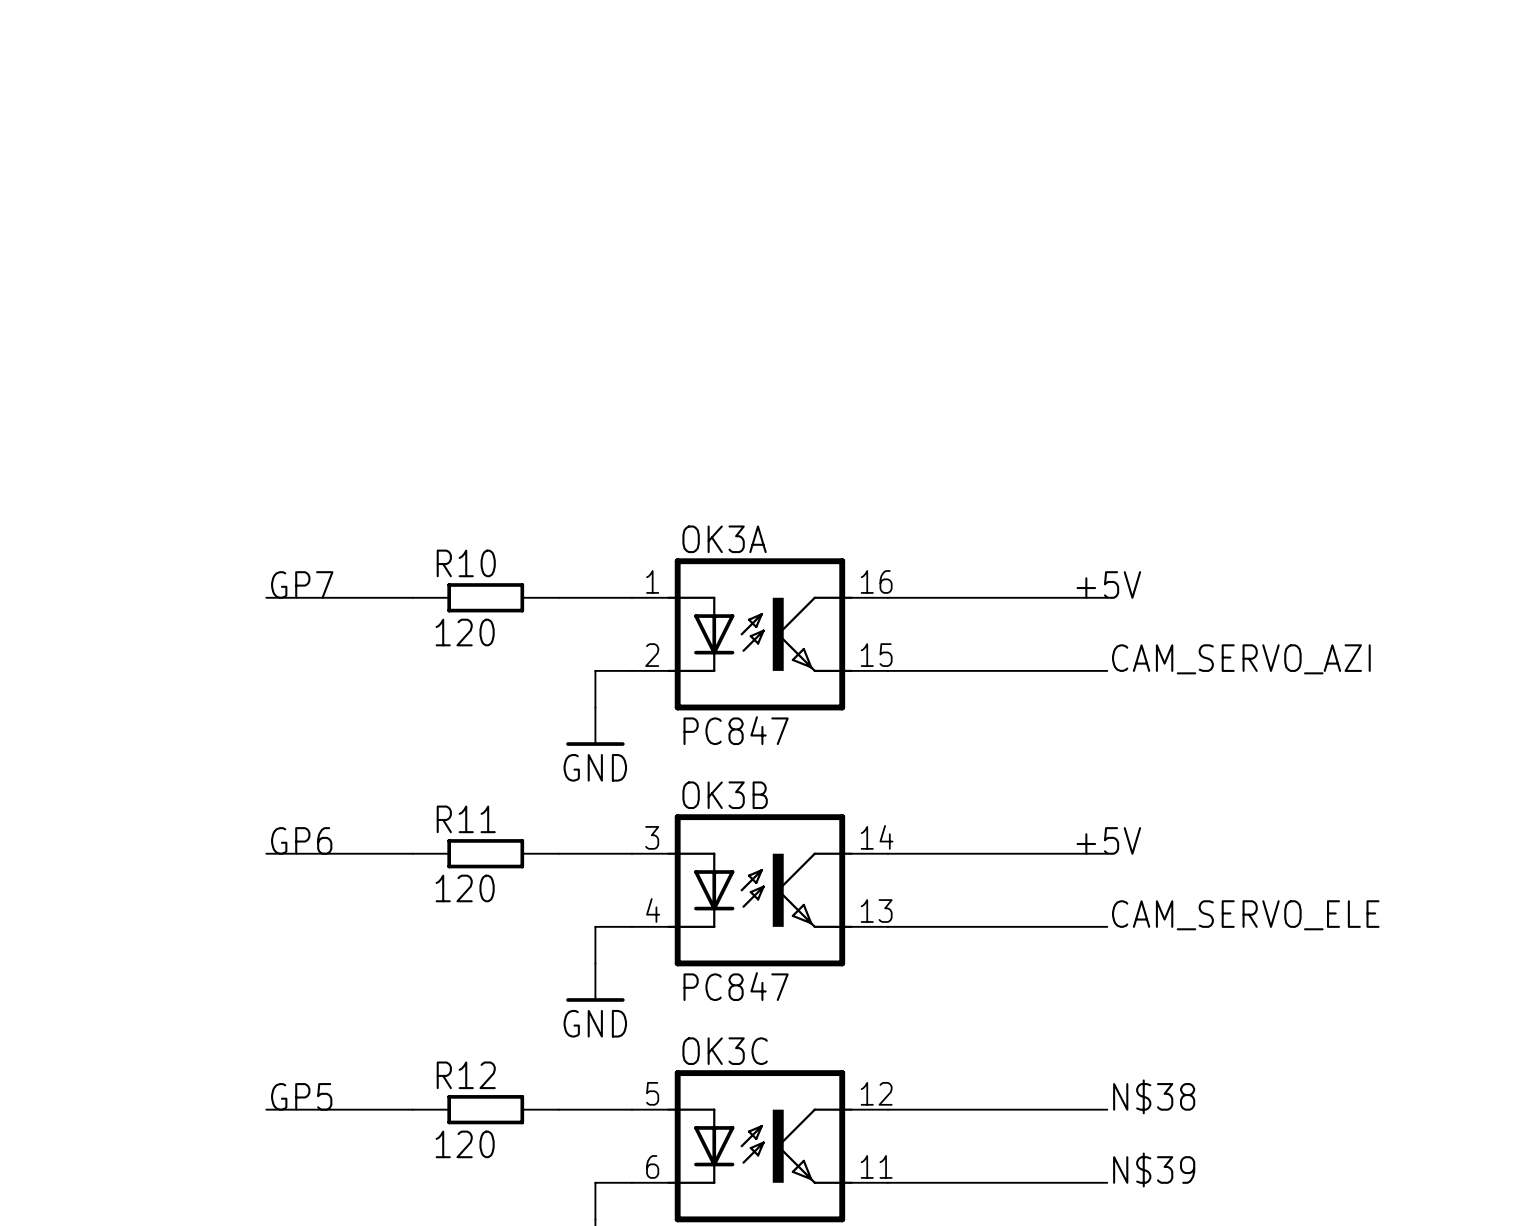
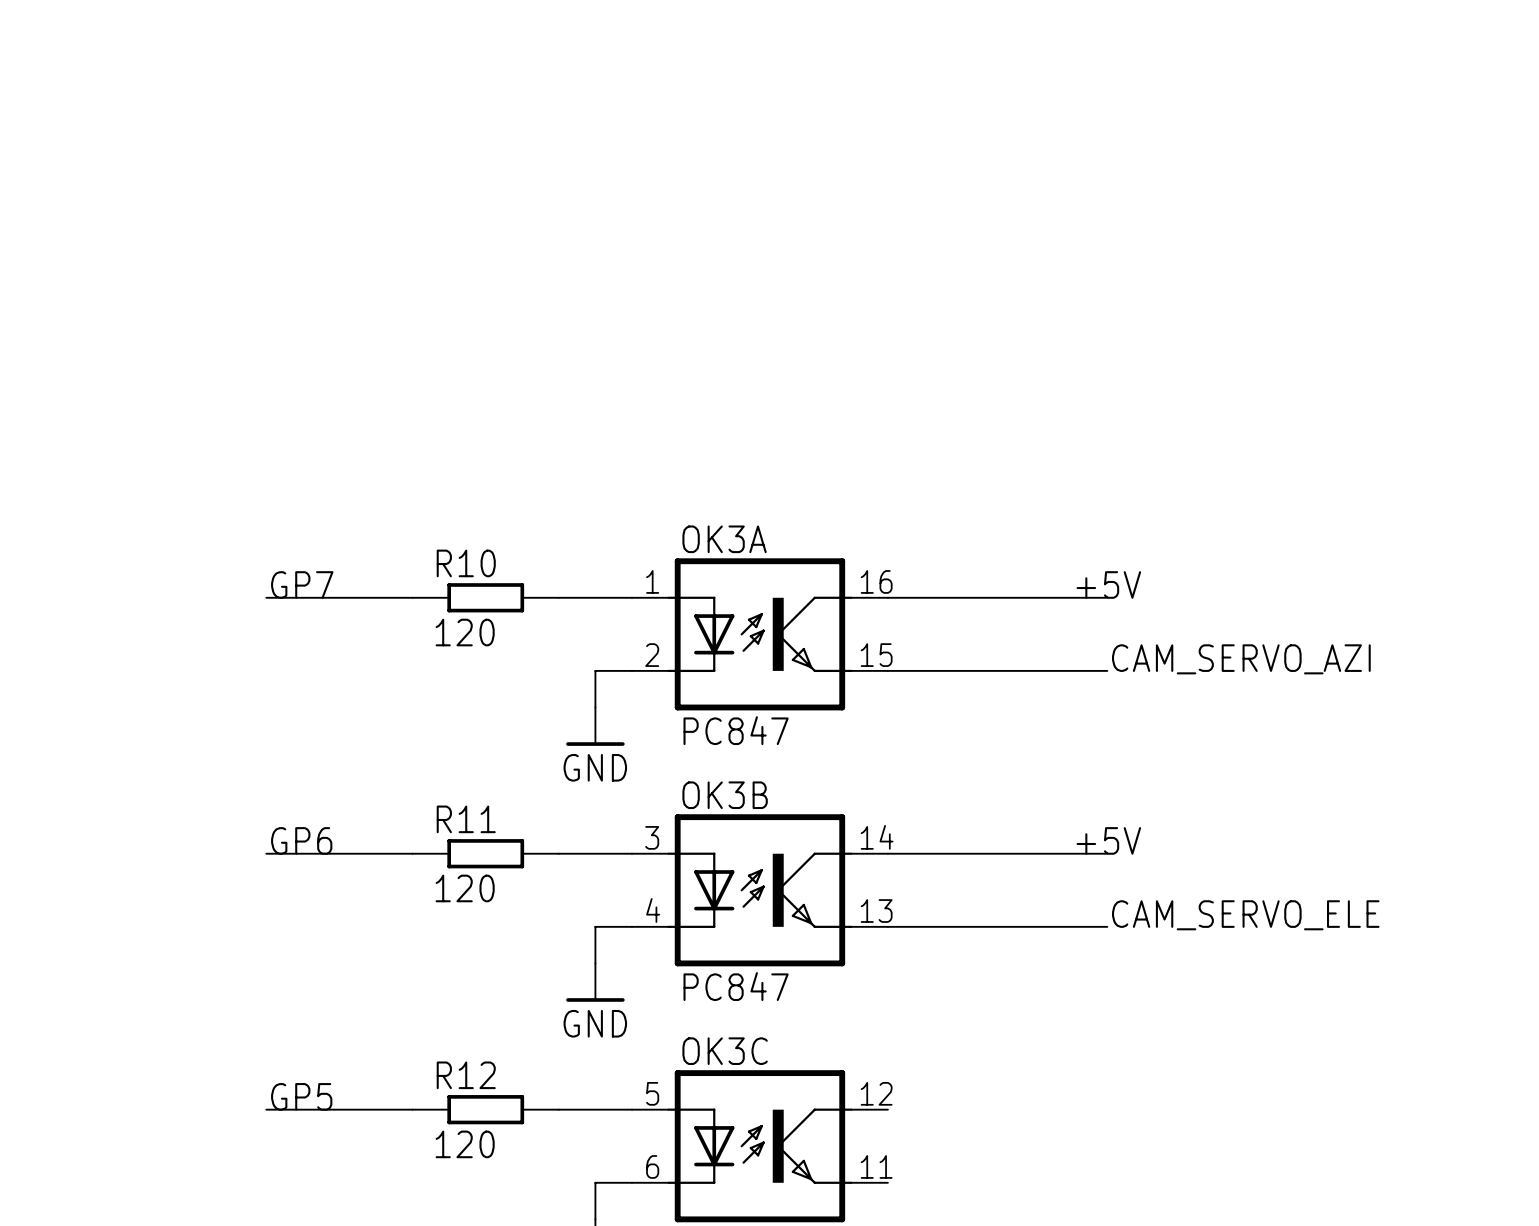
label: N$38 (1154, 1096) -> none
wire: (887, 1109) (1107, 1109) -> none
label: N$39 (1154, 1169) -> none
wire: (887, 1182) (1107, 1182) -> none

